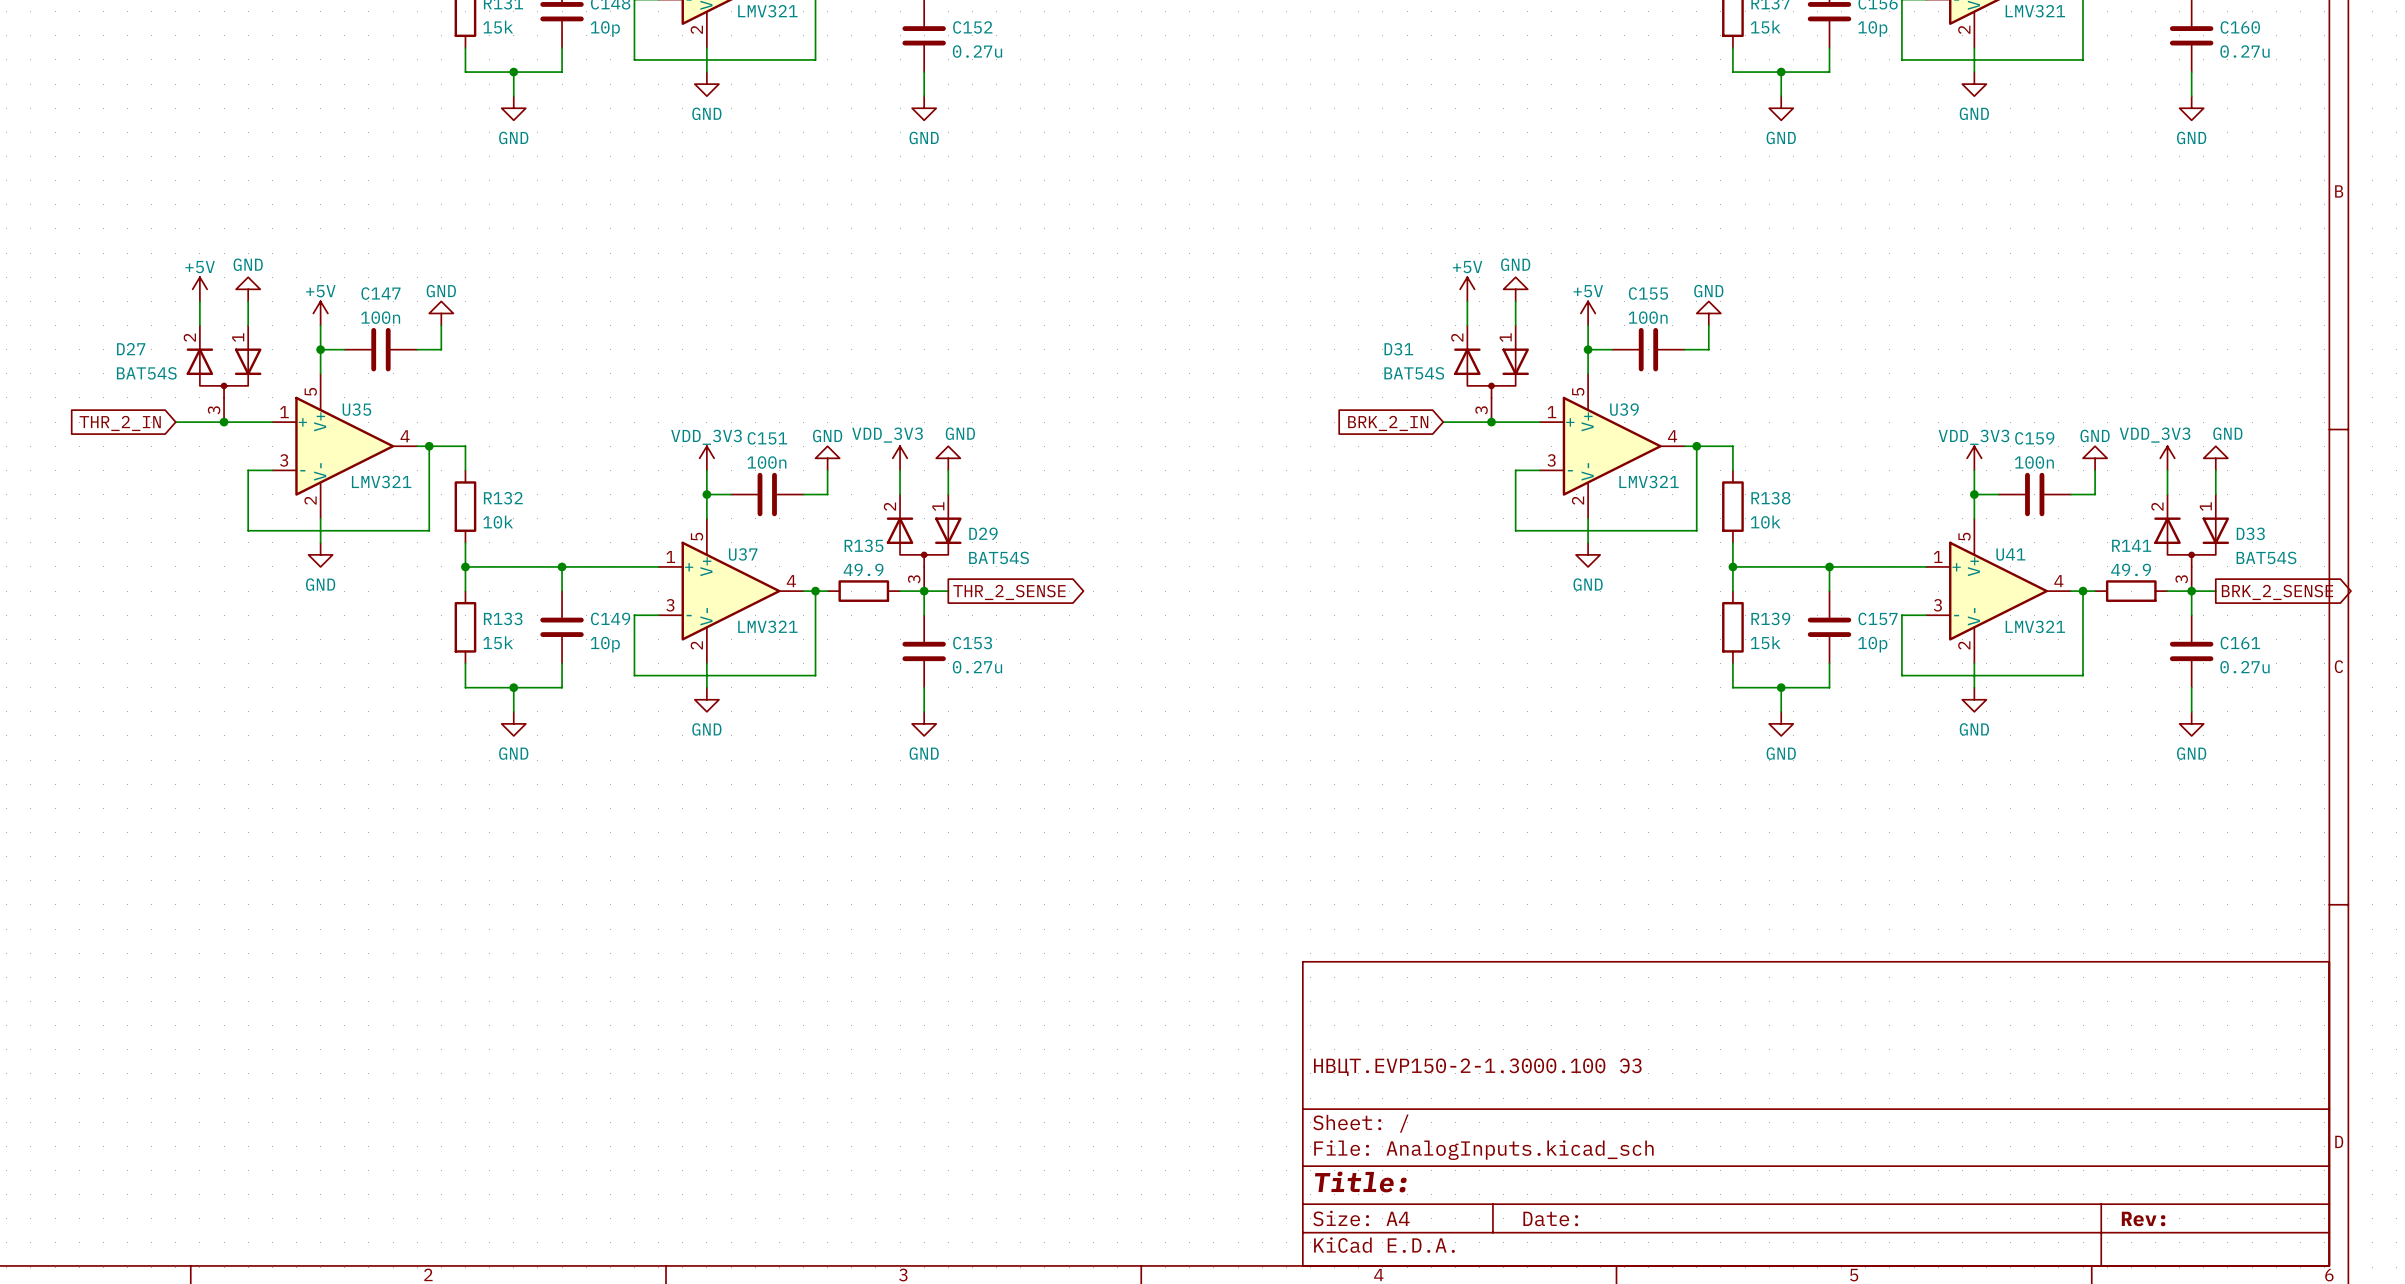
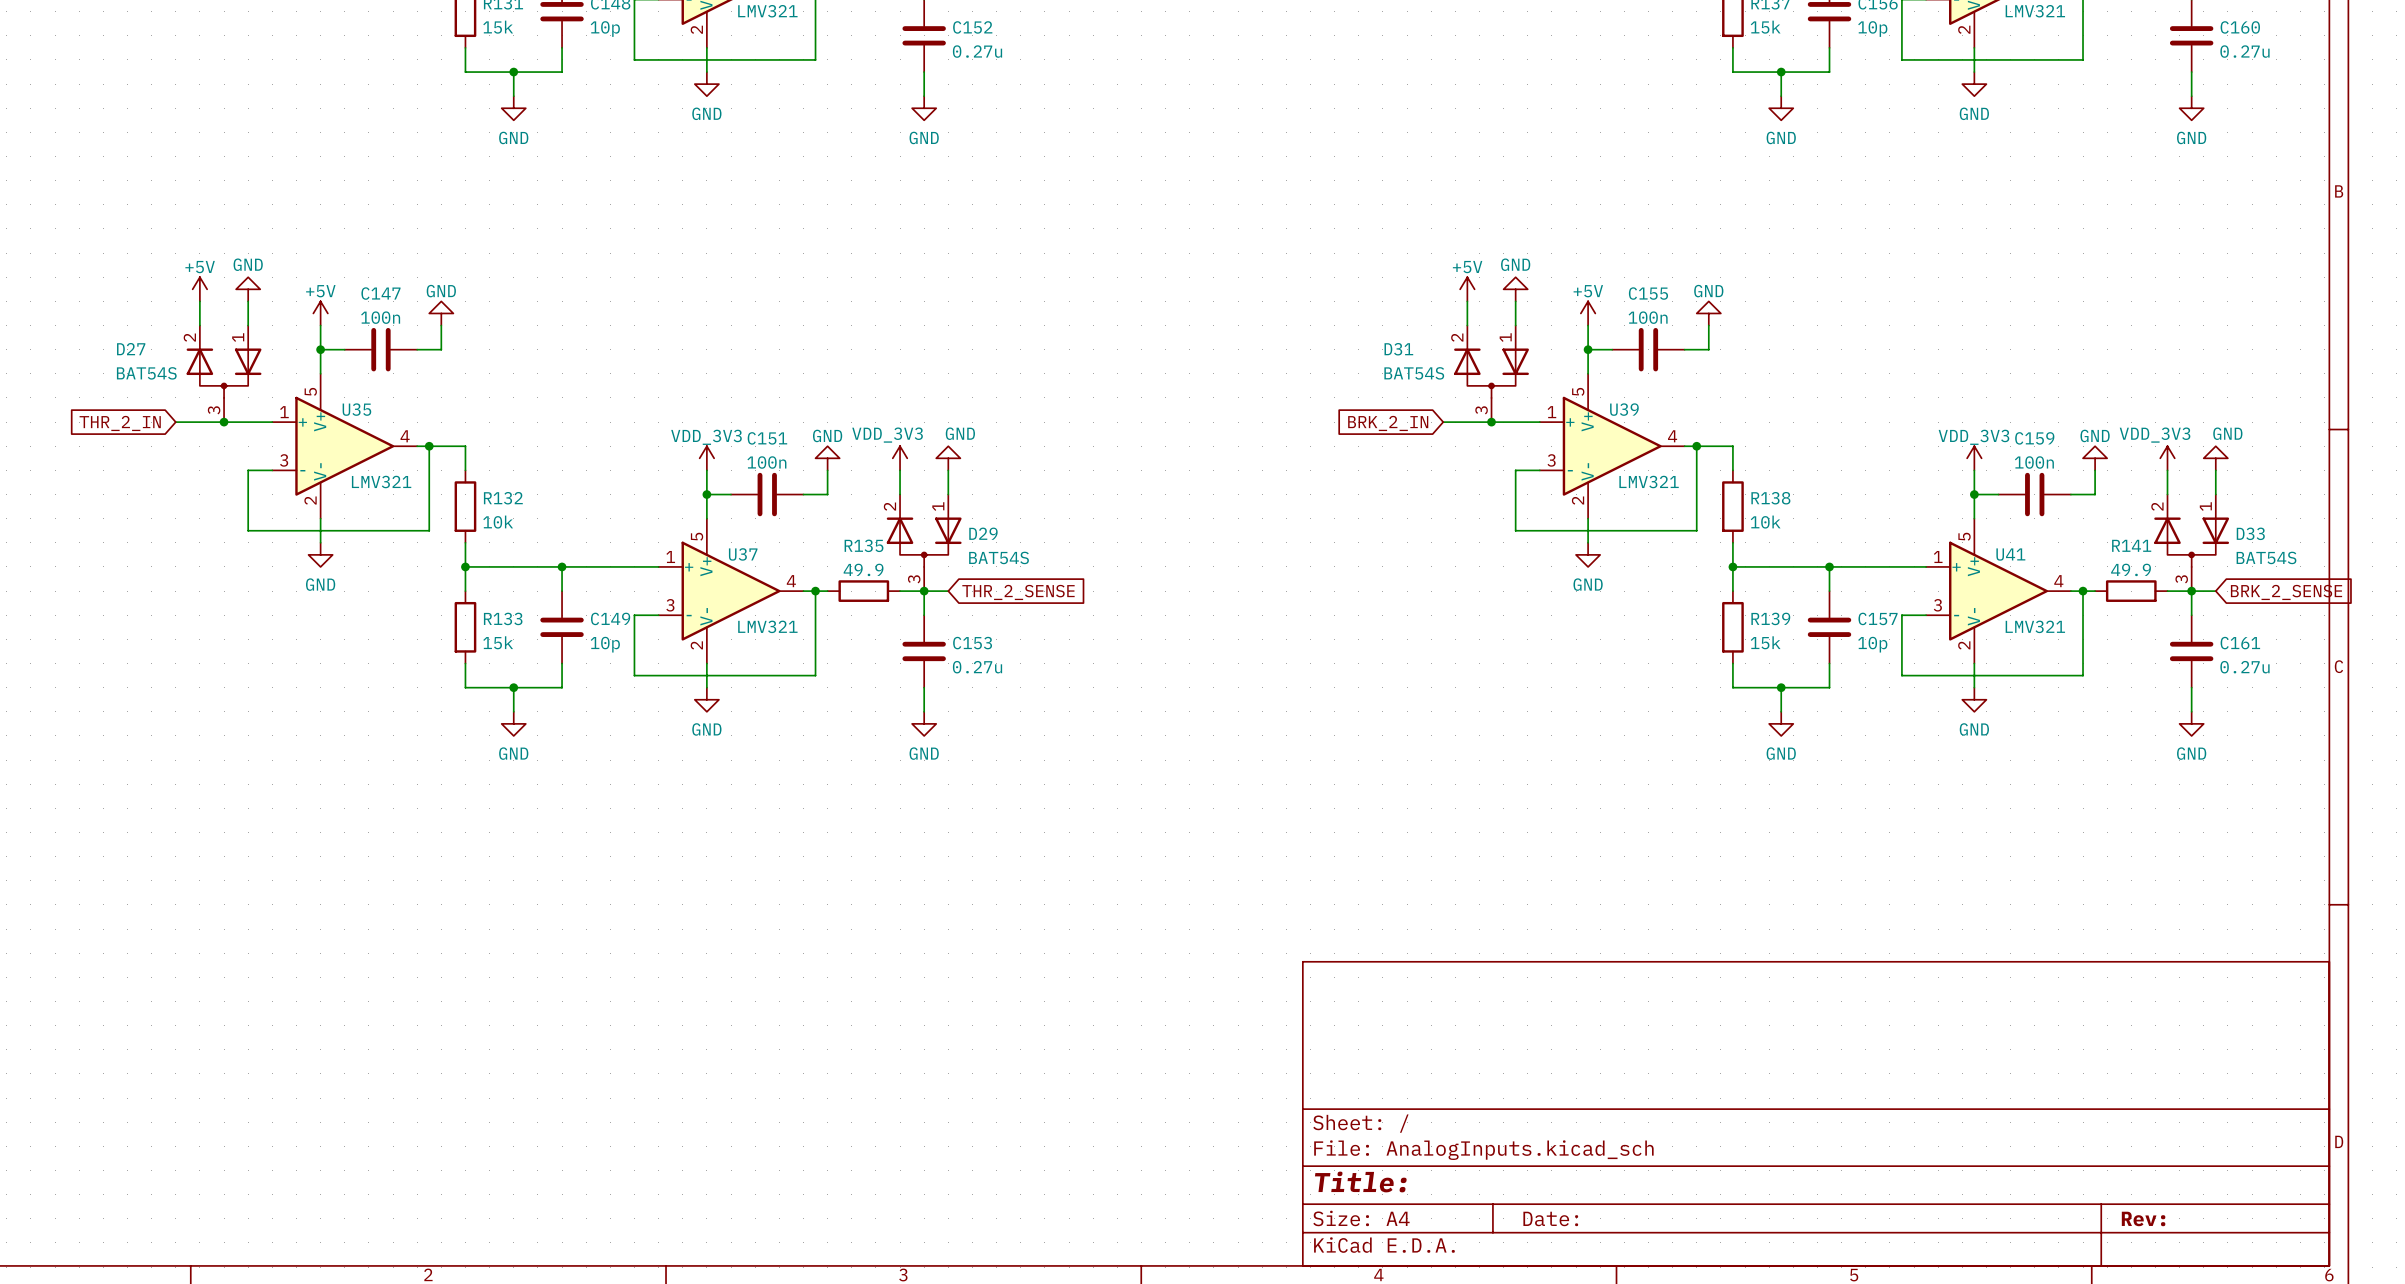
global label shape: output (1009, 592) -> input (1018, 592)
global label shape: output (2277, 592) -> input (2286, 592)
title block: НВЦТ.EVP150-2-1.3000.100 Э3 (1477, 1067) -> none

